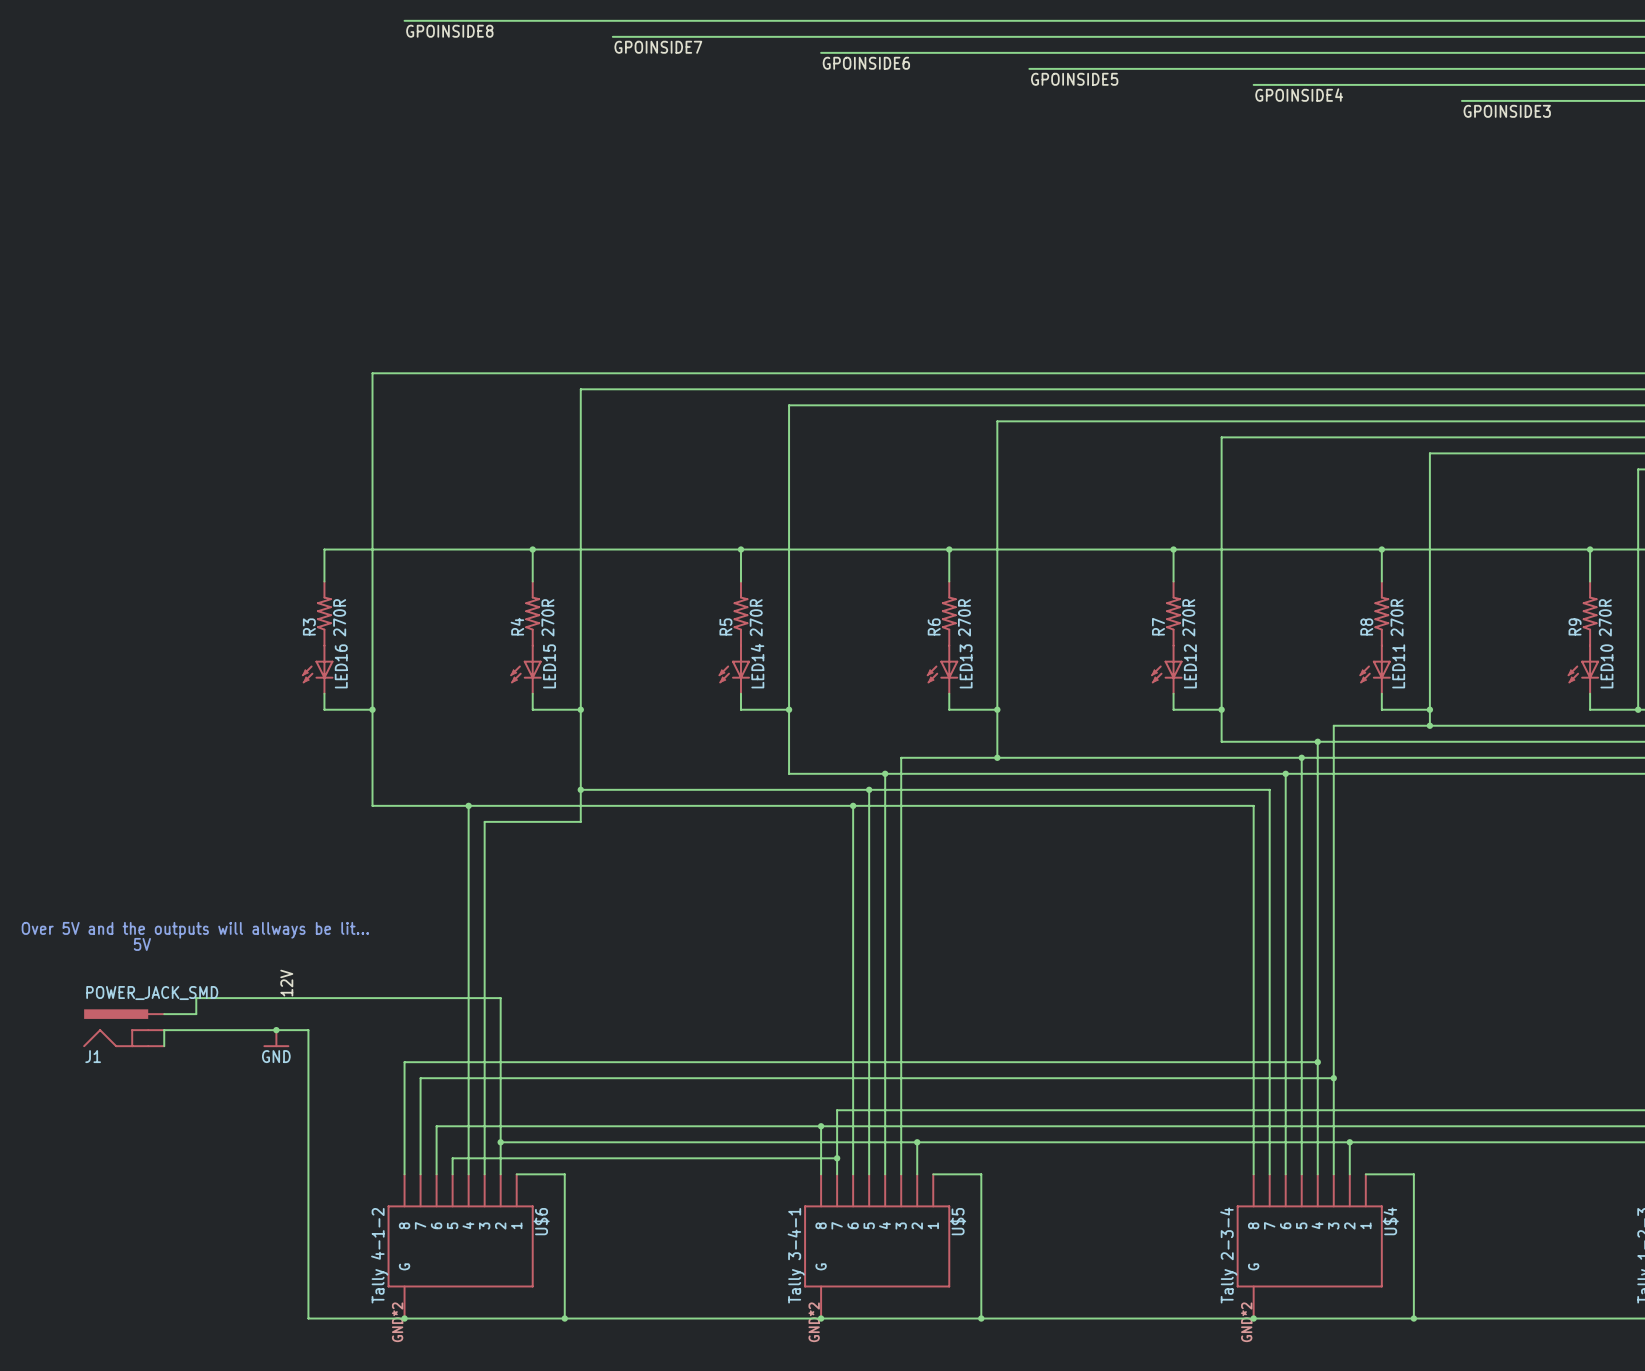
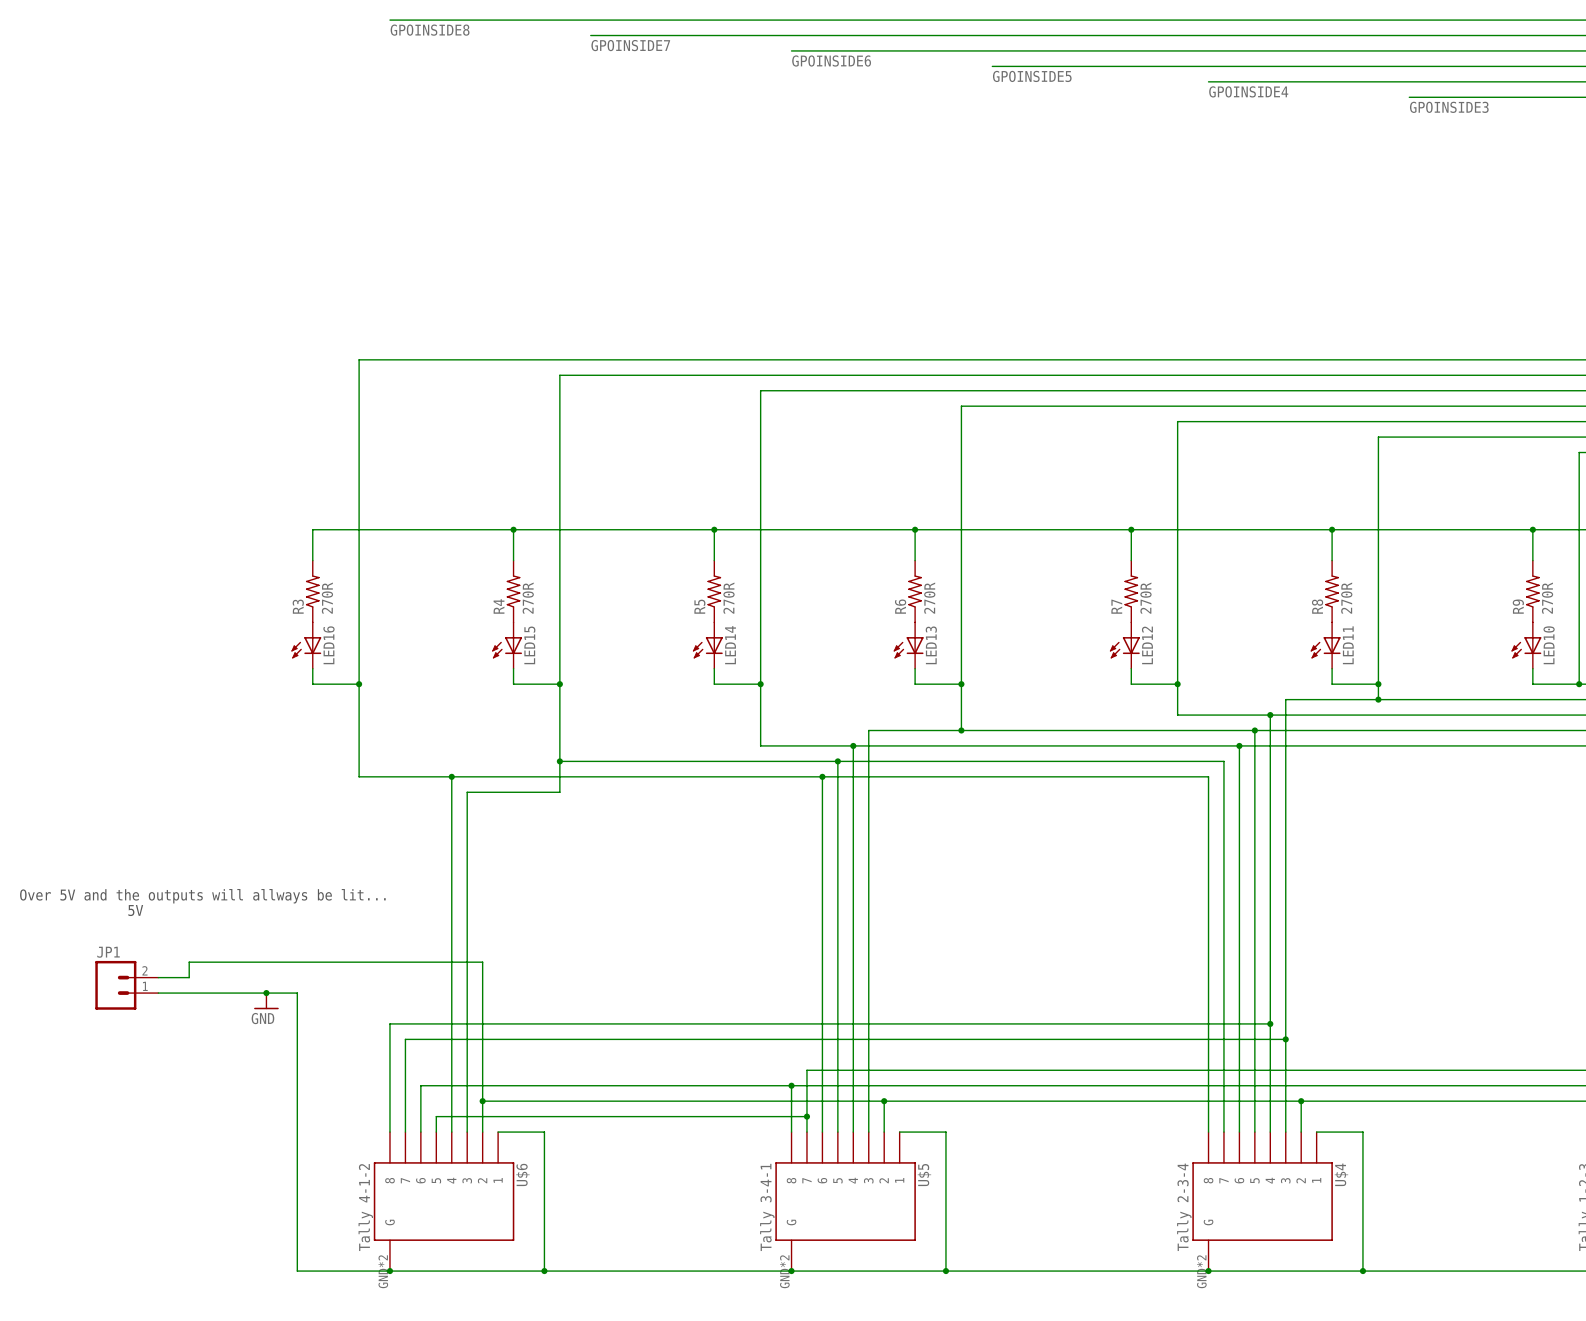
label: 12V (286, 983) -> none
JP1: none -> (126, 985)
J1: POWER_JACK_SMD (123, 1027) -> none
wire: (164, 1030) (164, 1046) -> none

